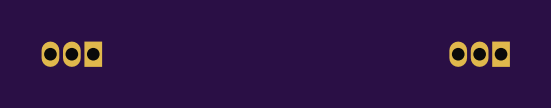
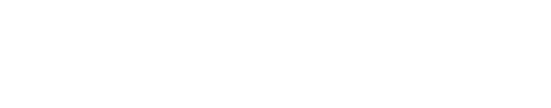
part: (71, 54) -> none
part: (479, 54) -> none

